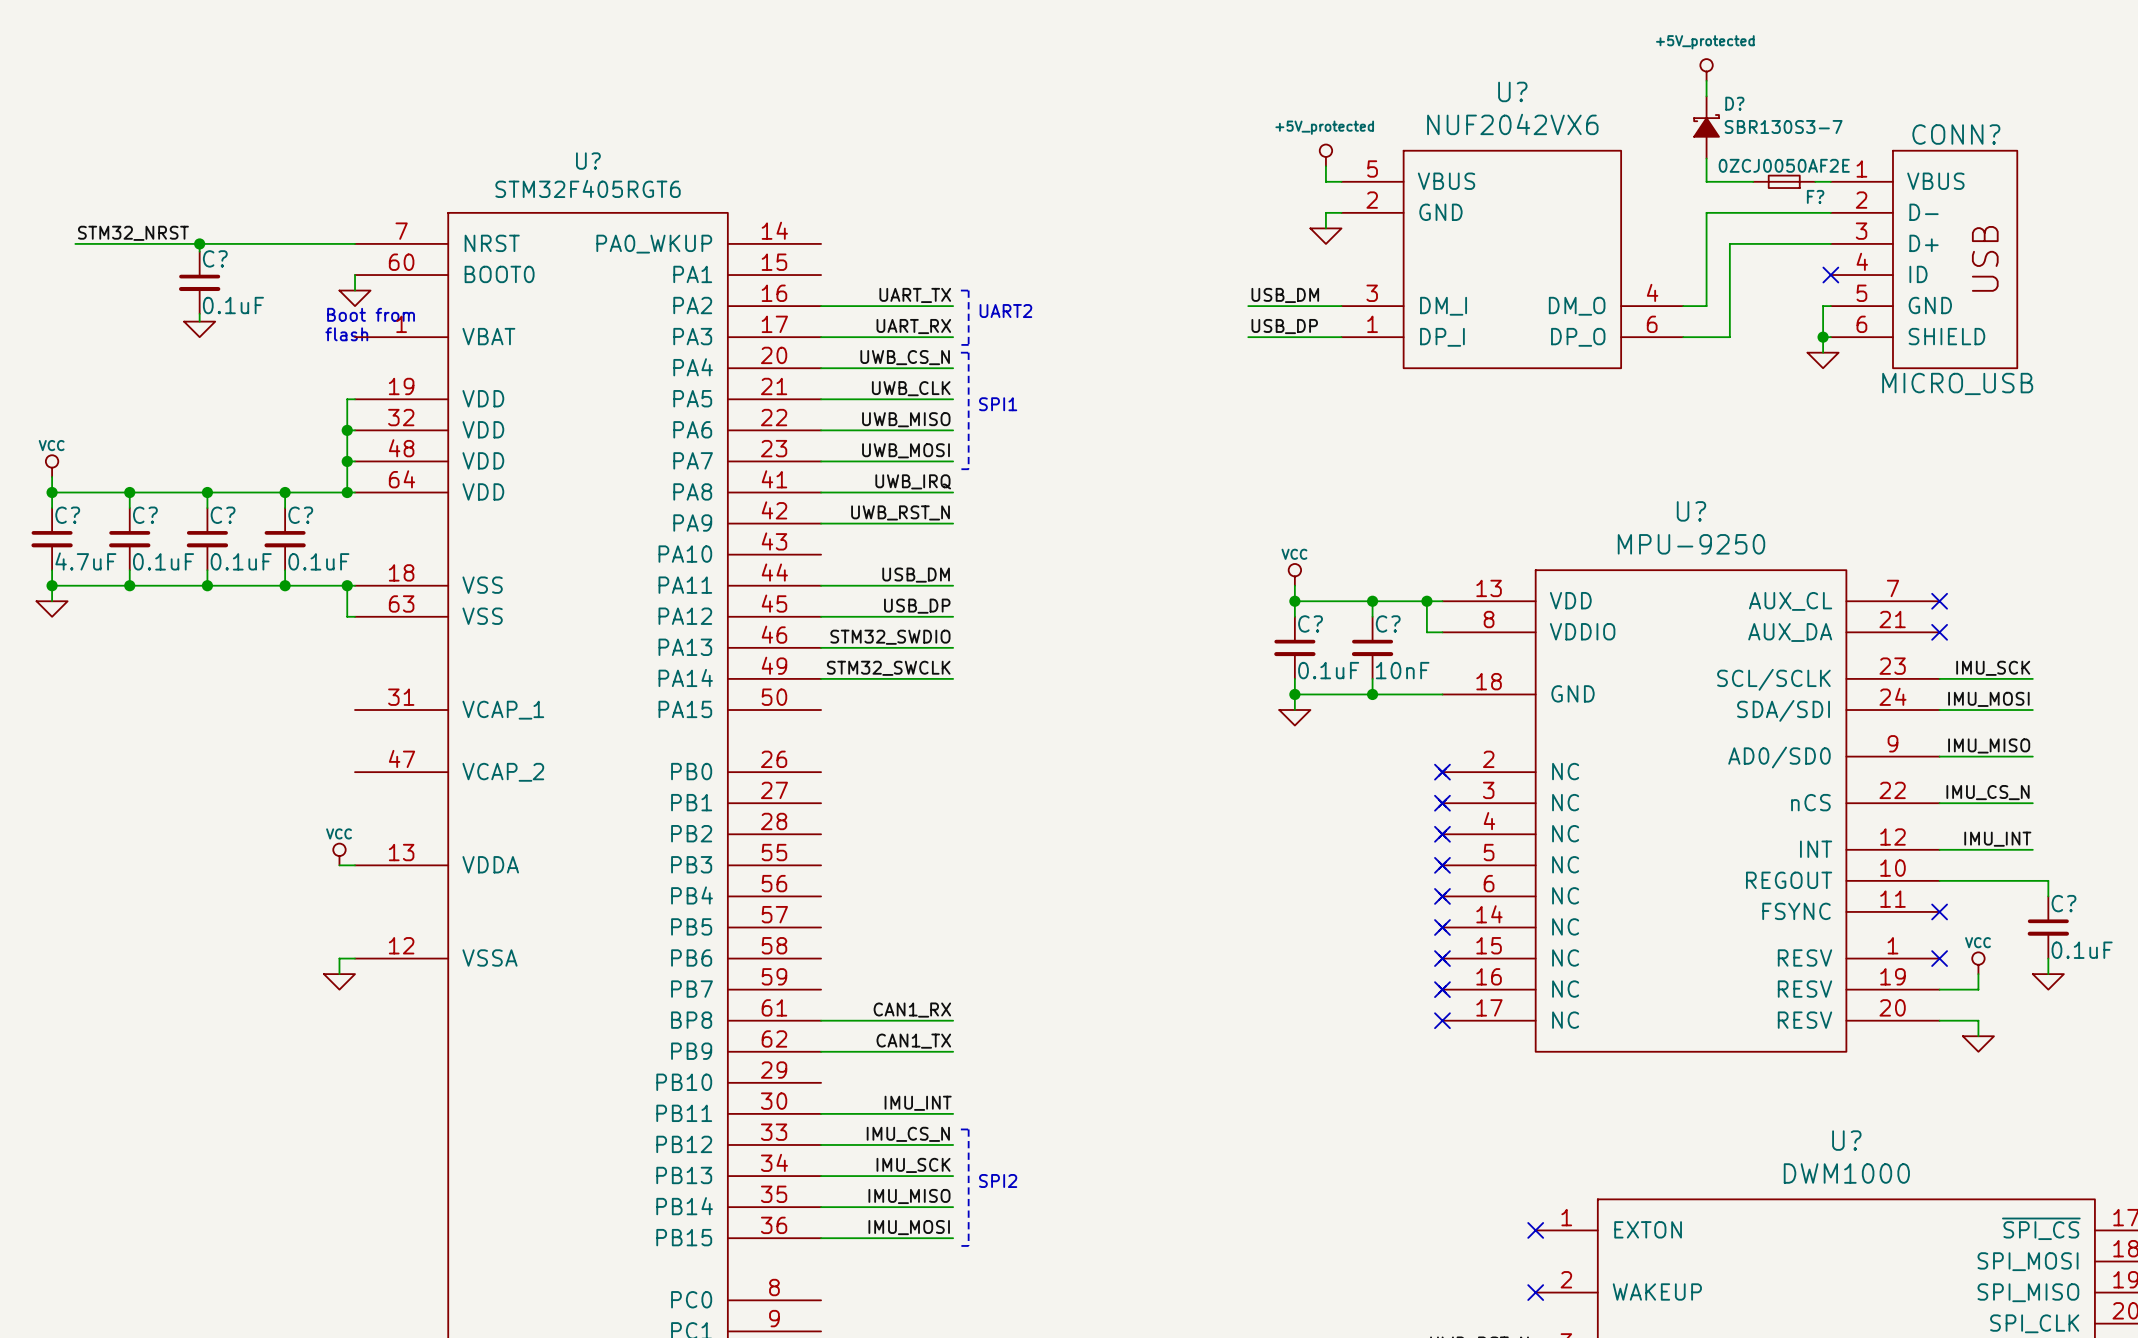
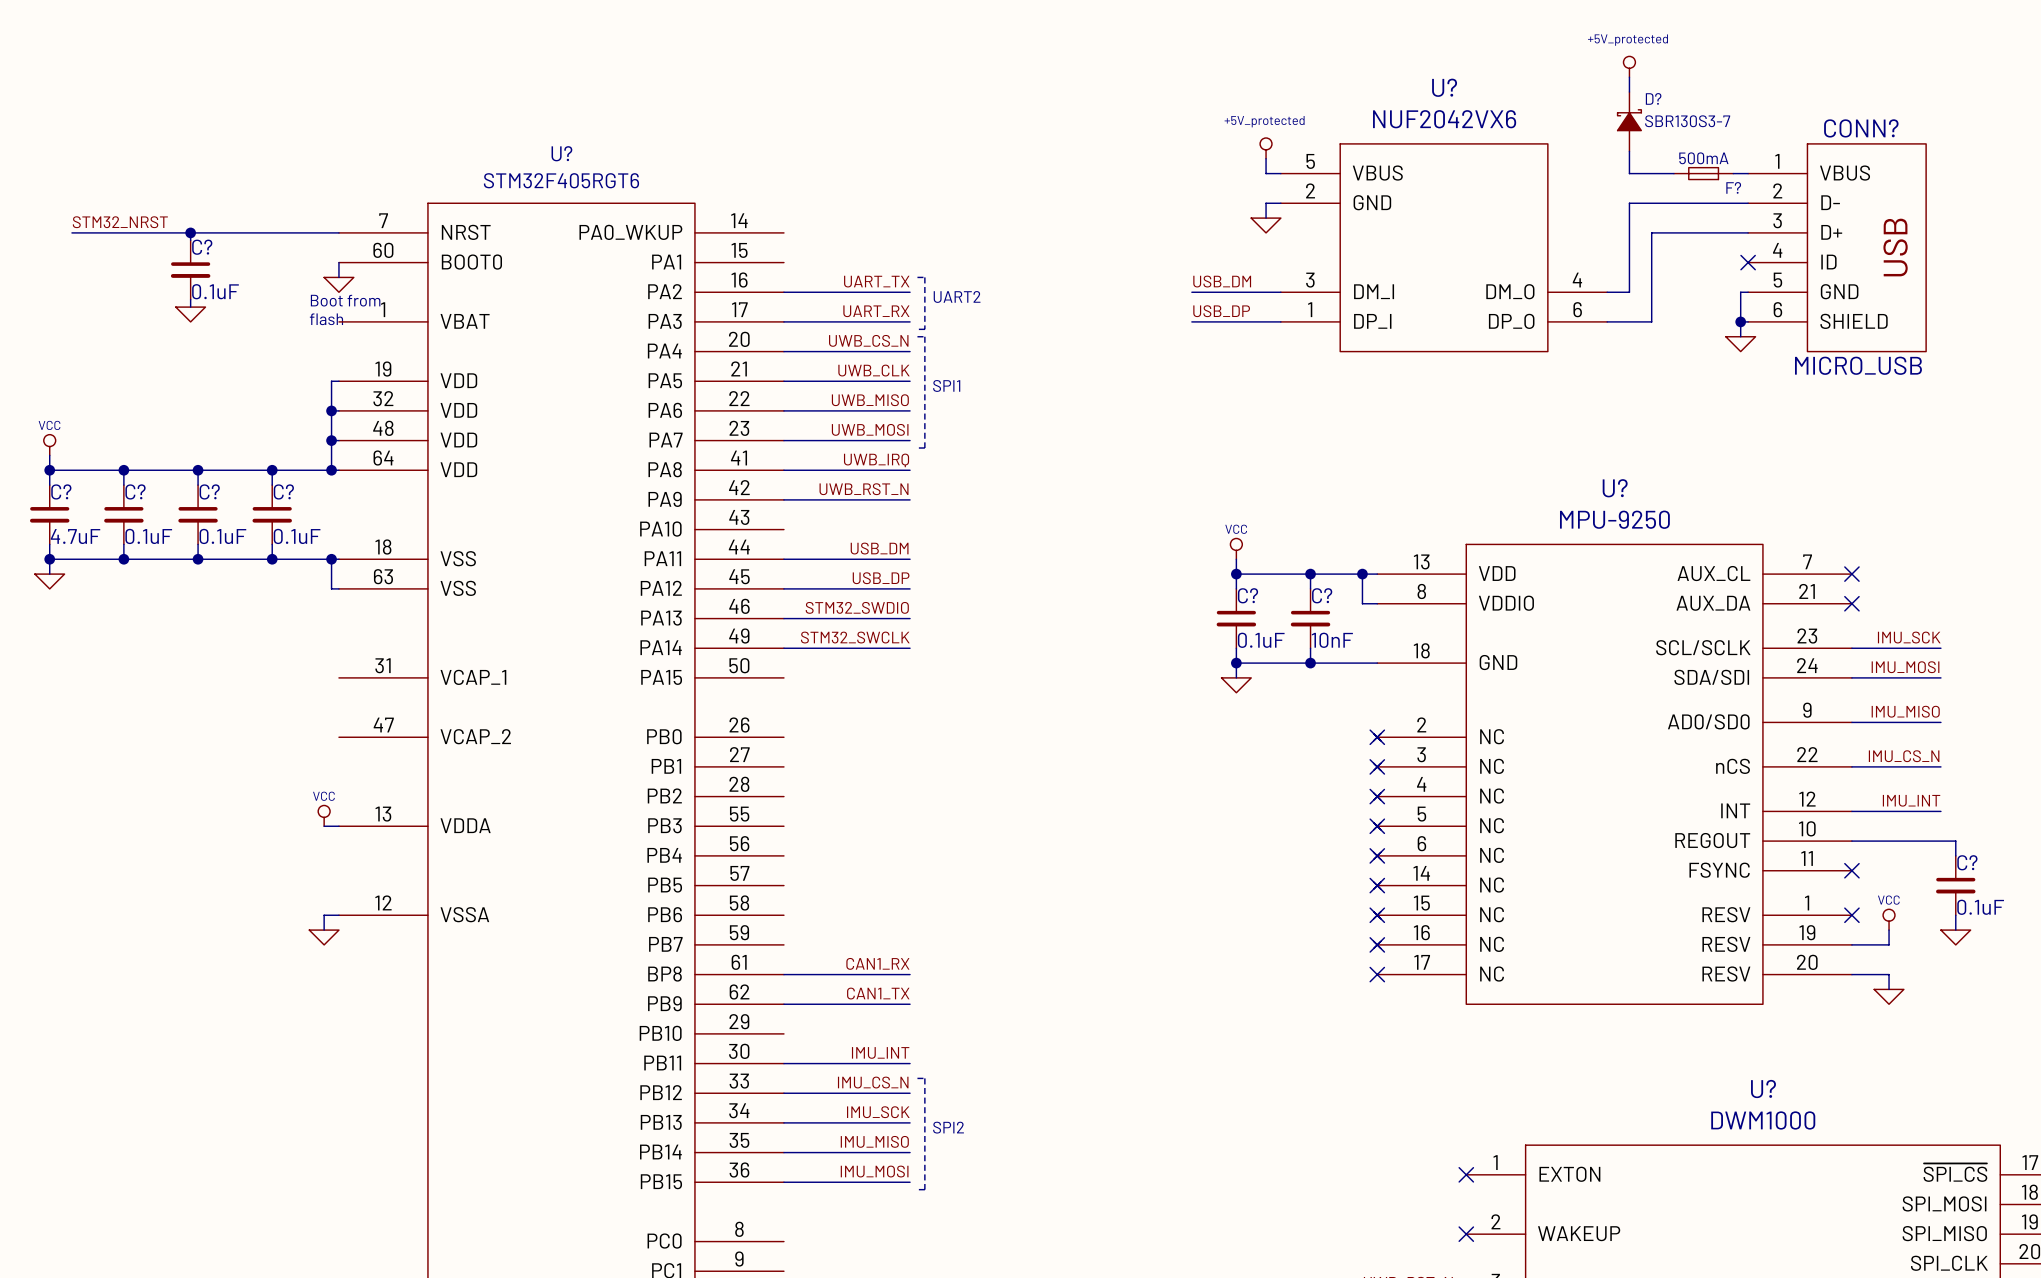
F? value: 0ZCJ0050AF2E (1784, 165) -> 500mA (1703, 158)

